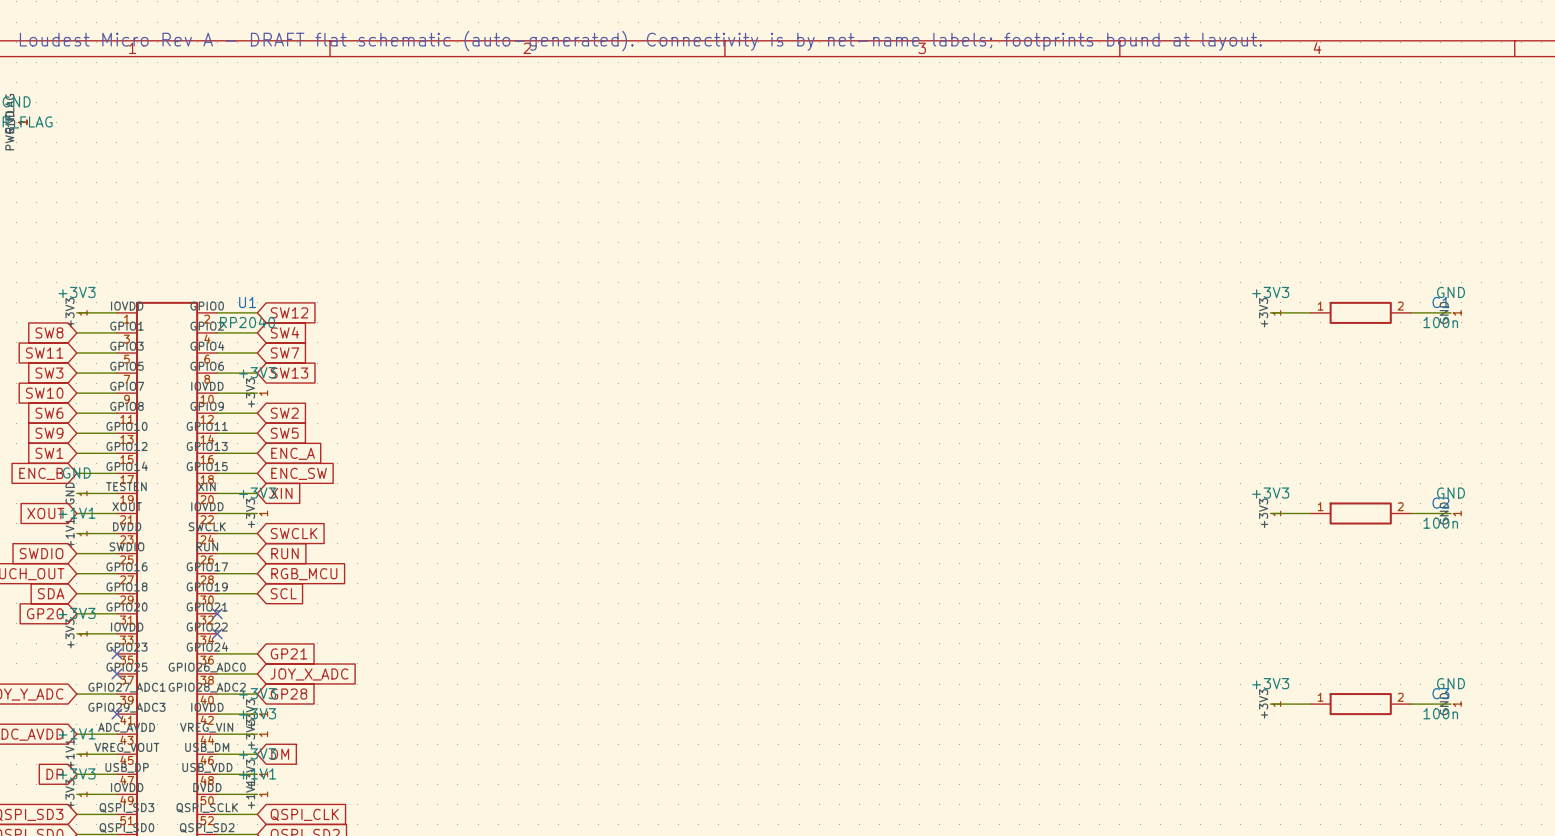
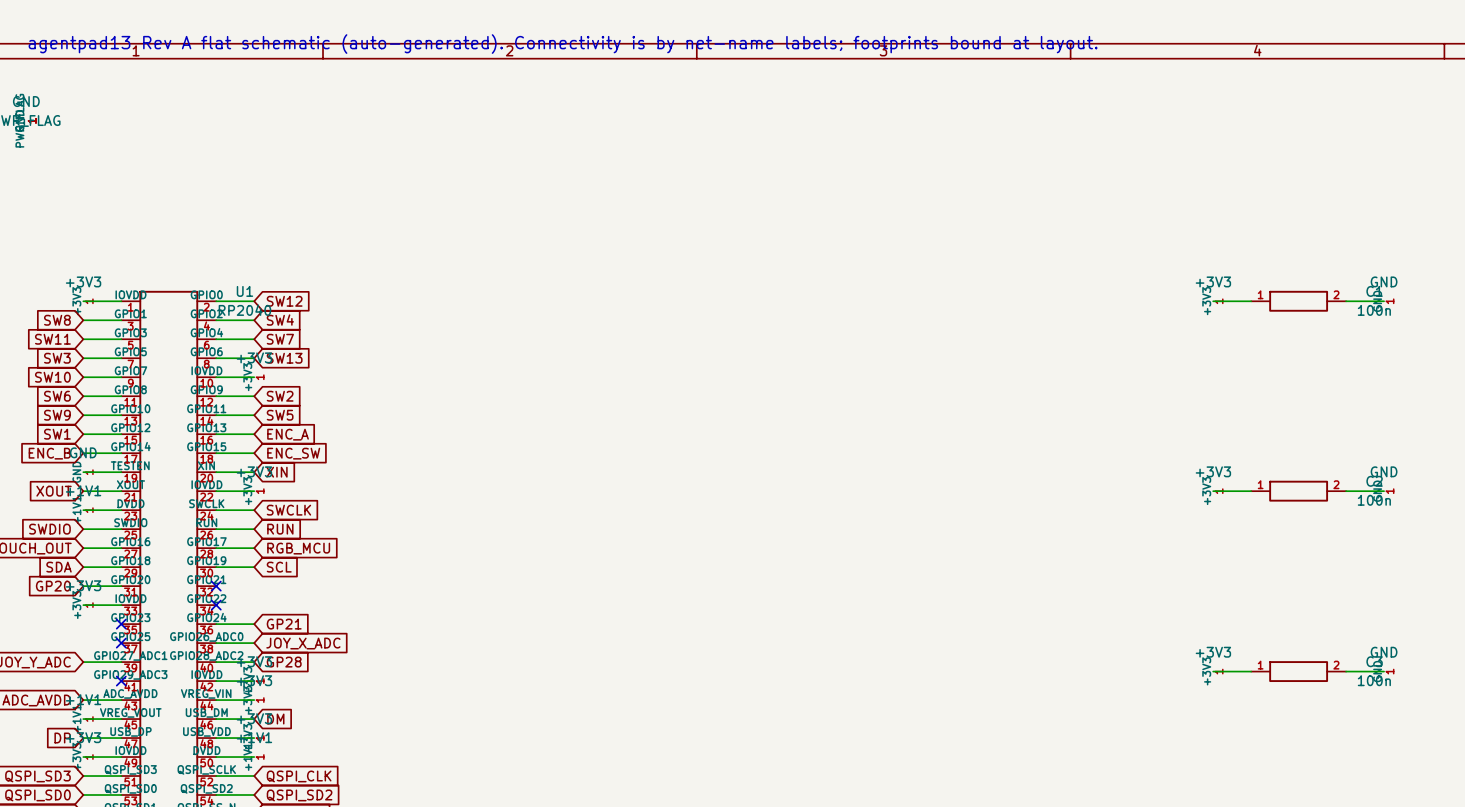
text: Loudest Micro Rev A - DRAFT flat schematic (auto-generated). Connectivity is by net-name labels; footprints bound at layout. (640, 41) -> agentpad13 Rev A flat schematic (auto-generated). Connectivity is by net-name labels; footprints bound at layout. (563, 44)

